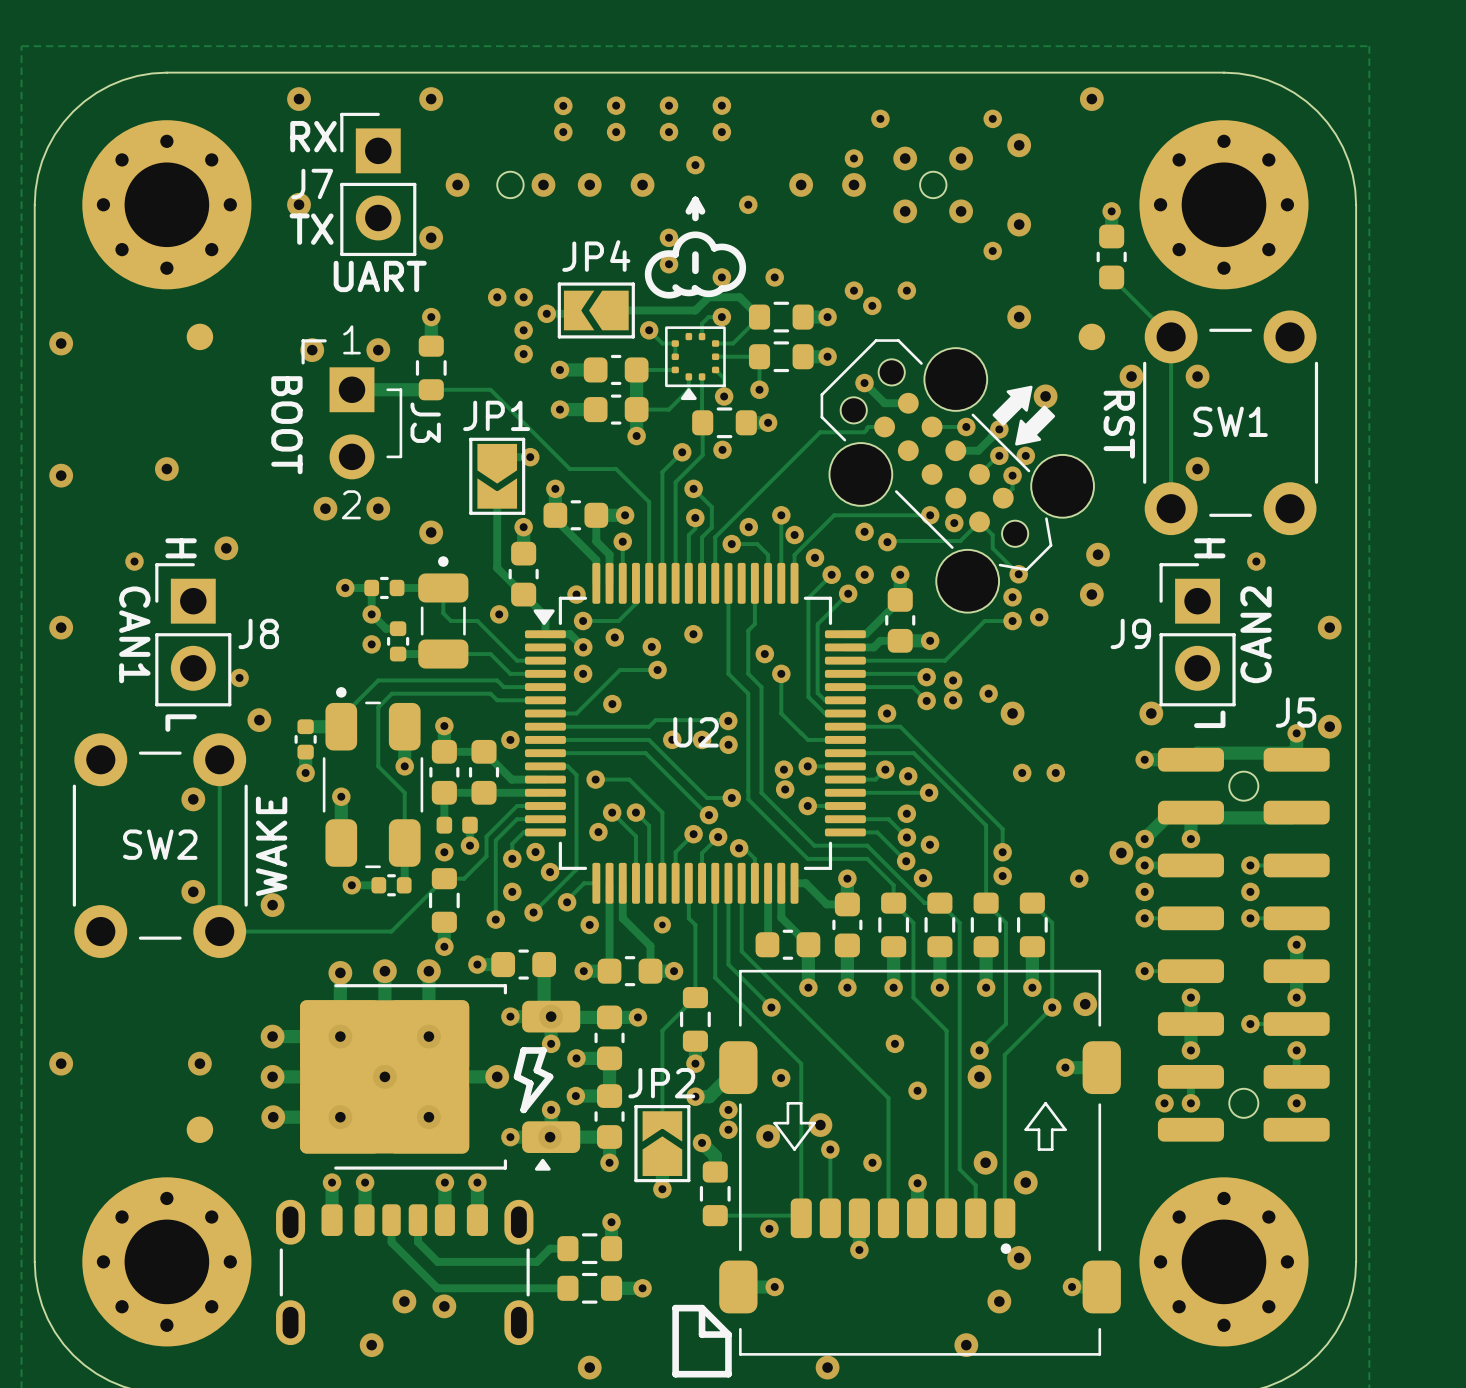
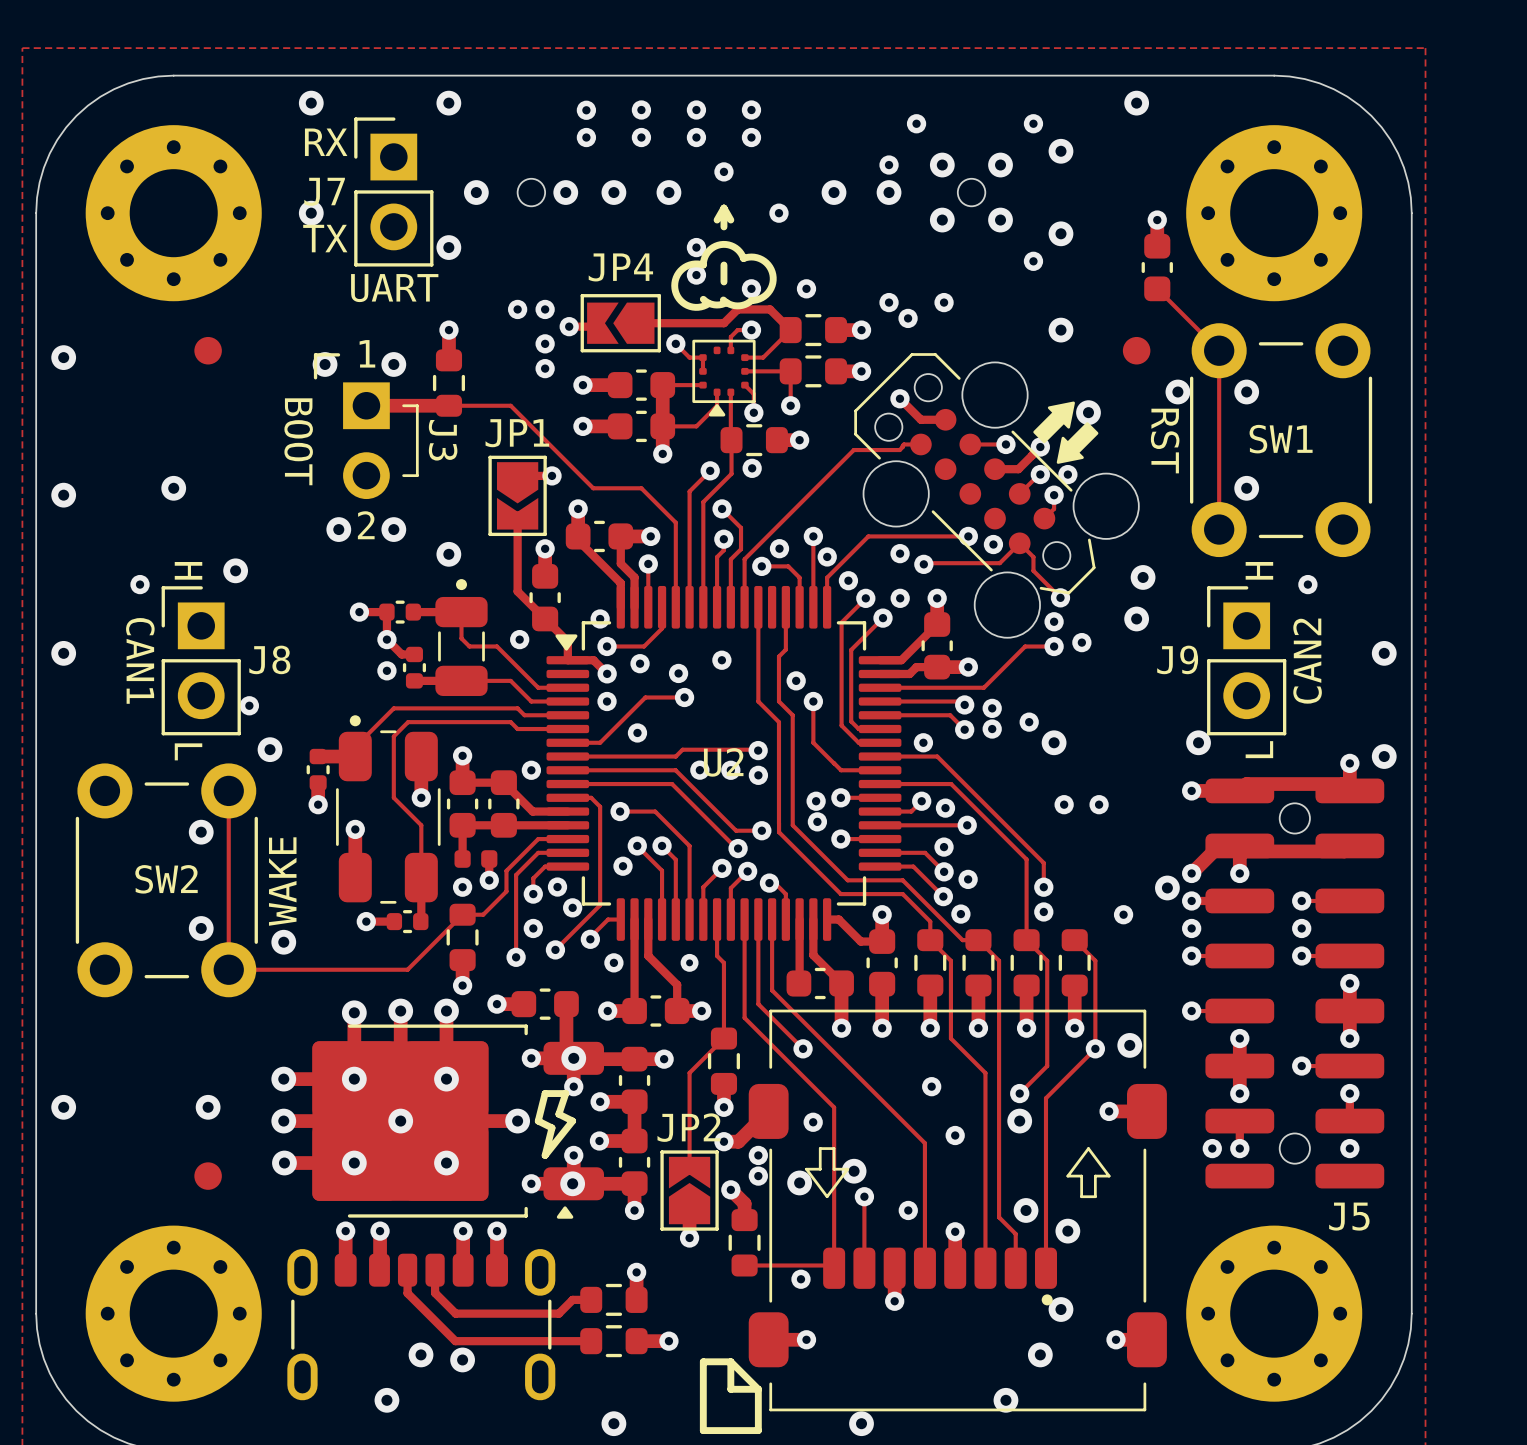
J5 name position: J5 (1296, 712) -> J5 (1349, 1216)

